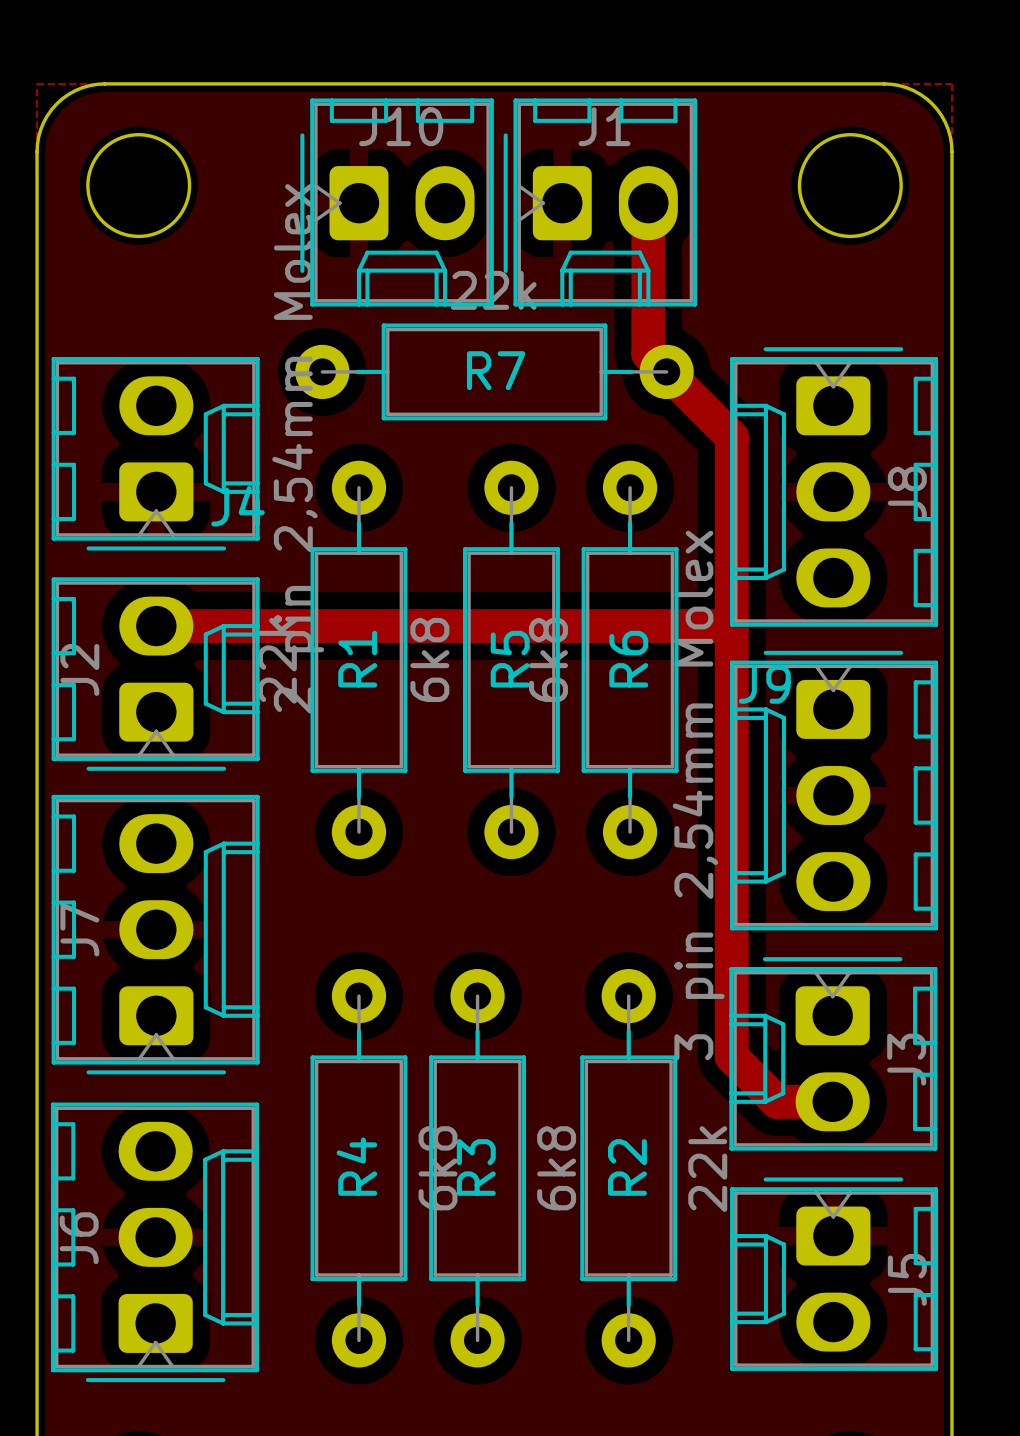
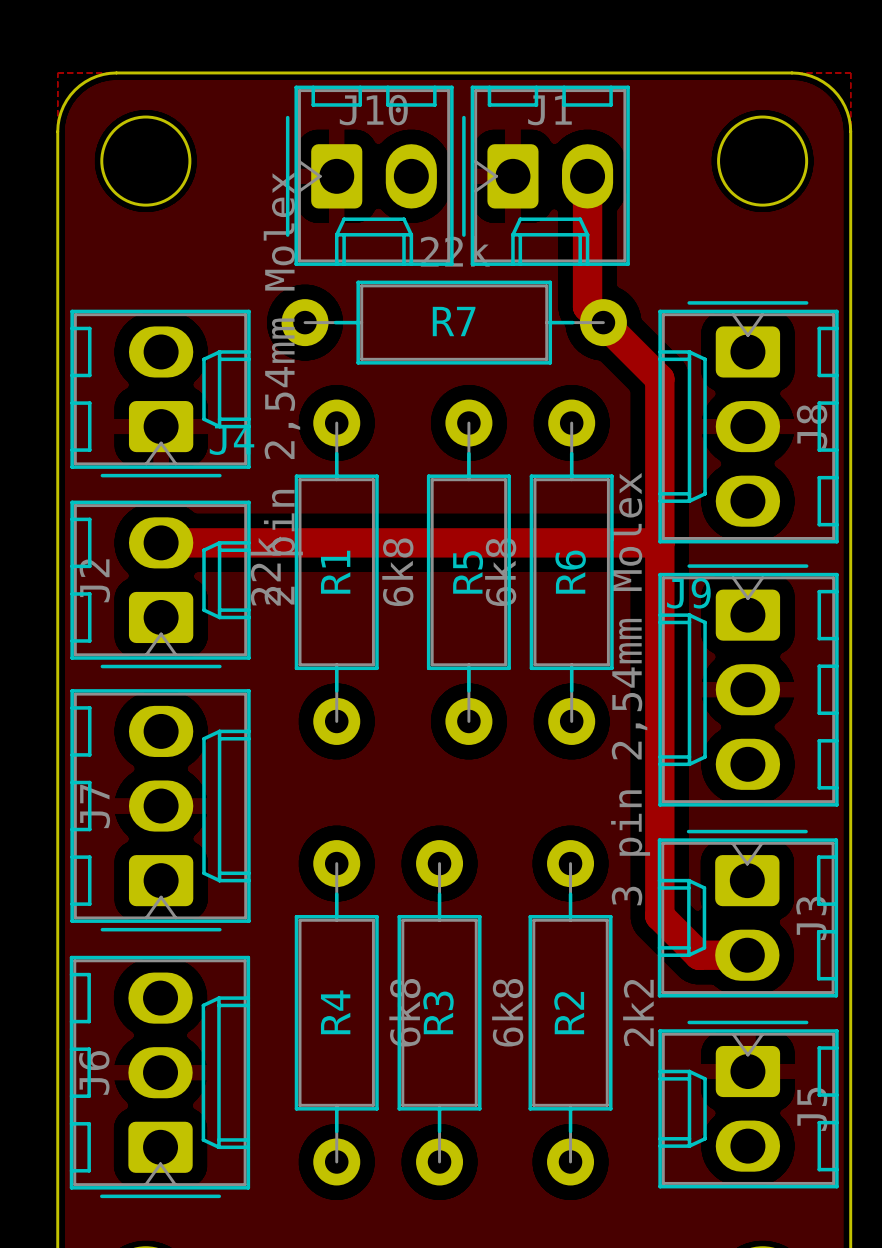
R2 value: 22k (707, 1169) -> 2k2 (638, 1013)

